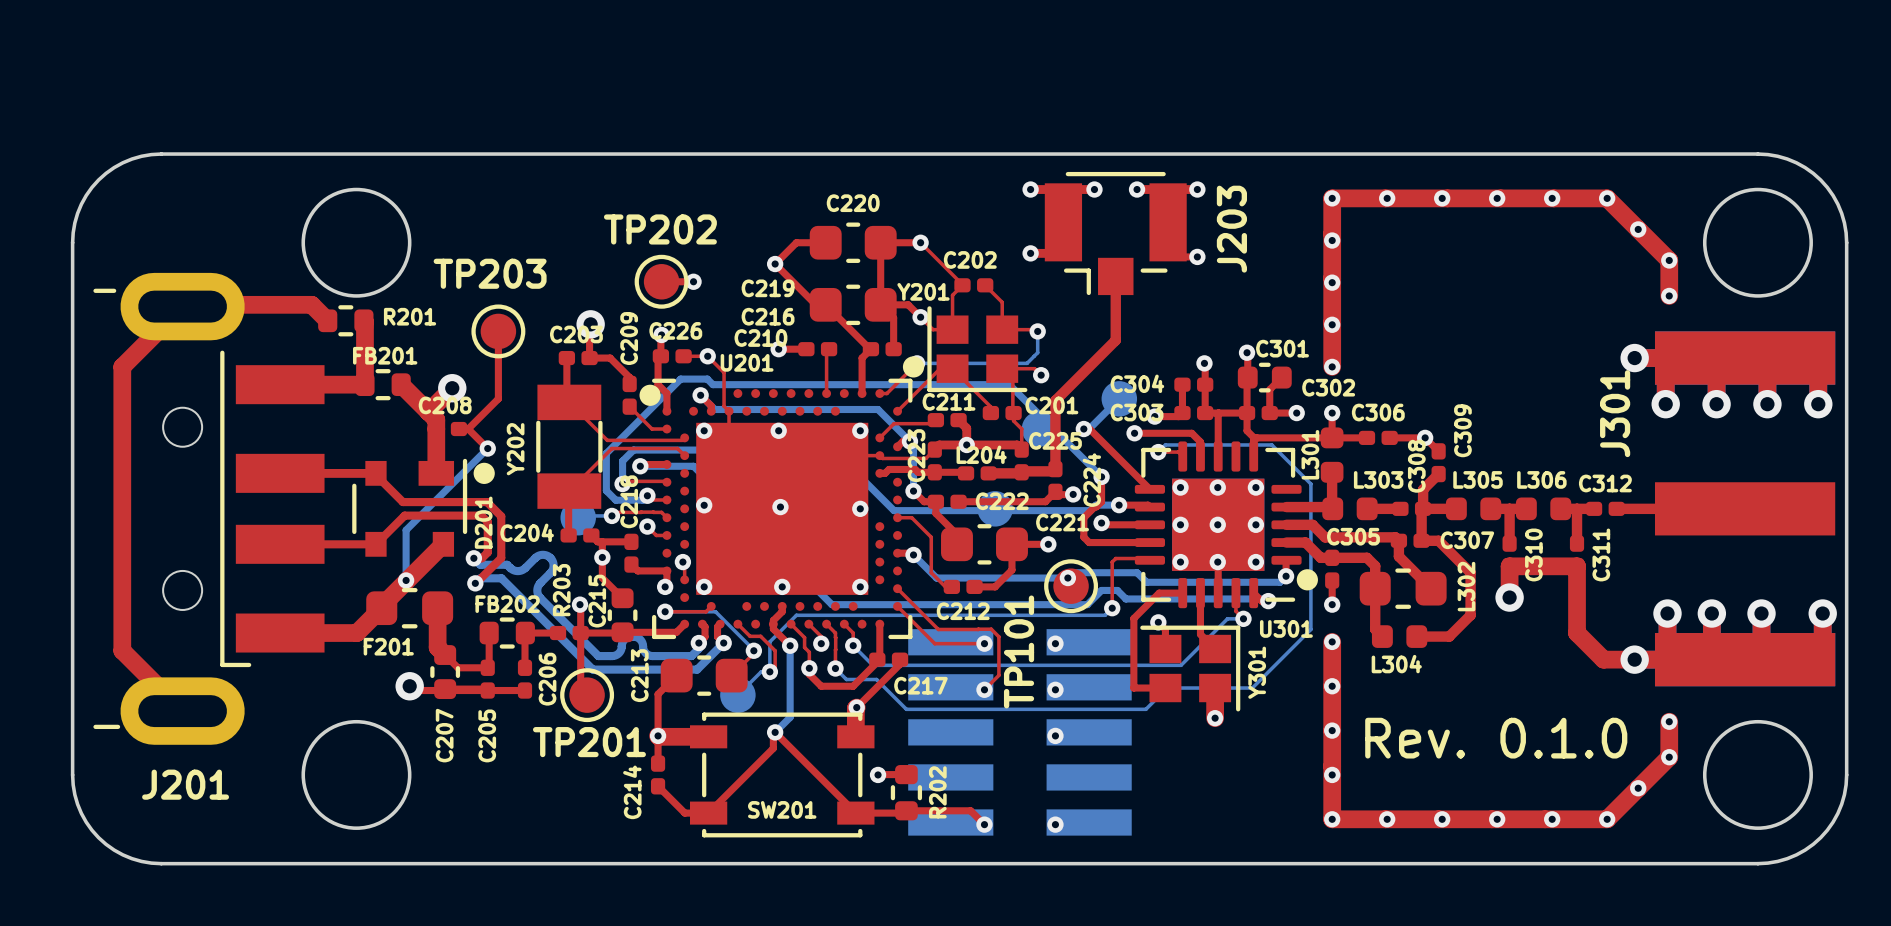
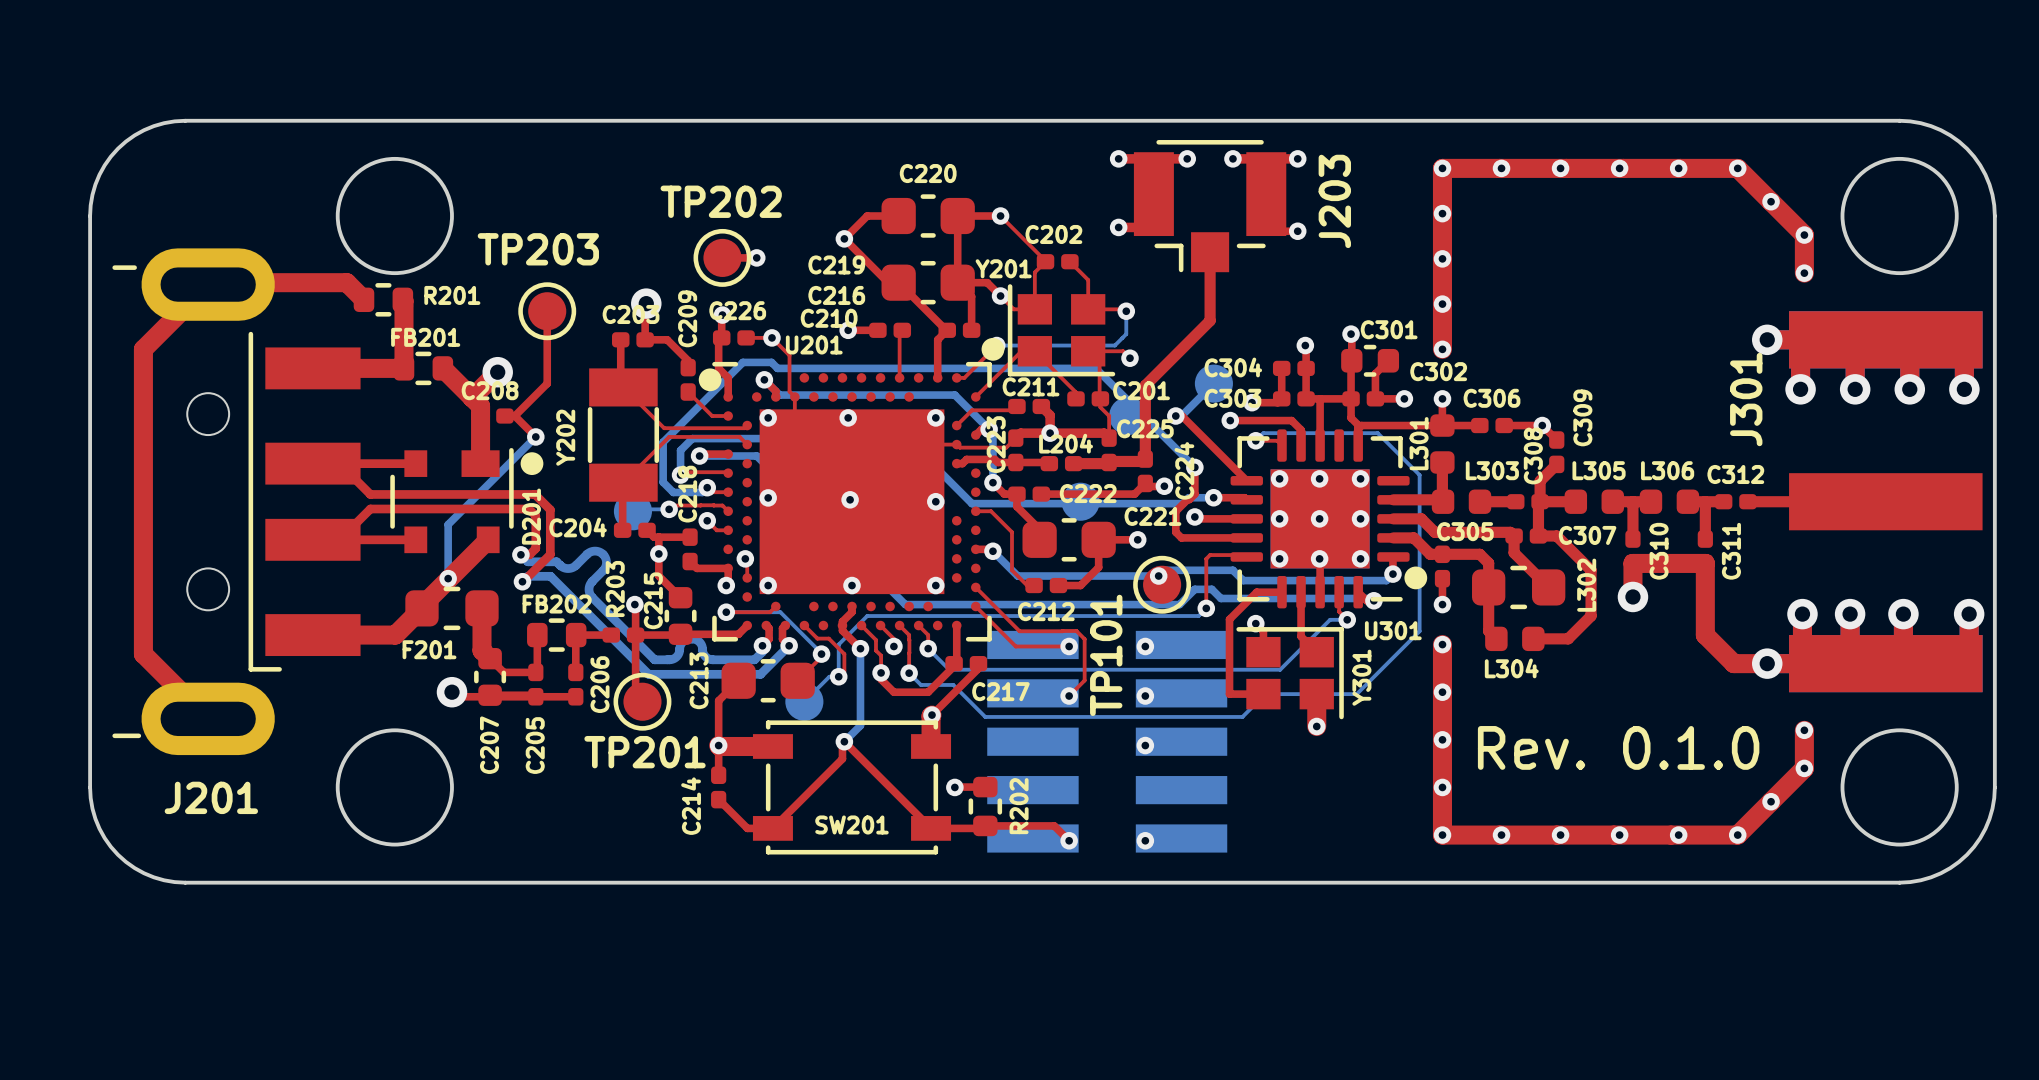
top track: (374, 473) (402, 502) -> (339, 463) (370, 494) (444, 494)
top track: (404, 515) (375, 544) -> (446, 508) (370, 508) (339, 539)

